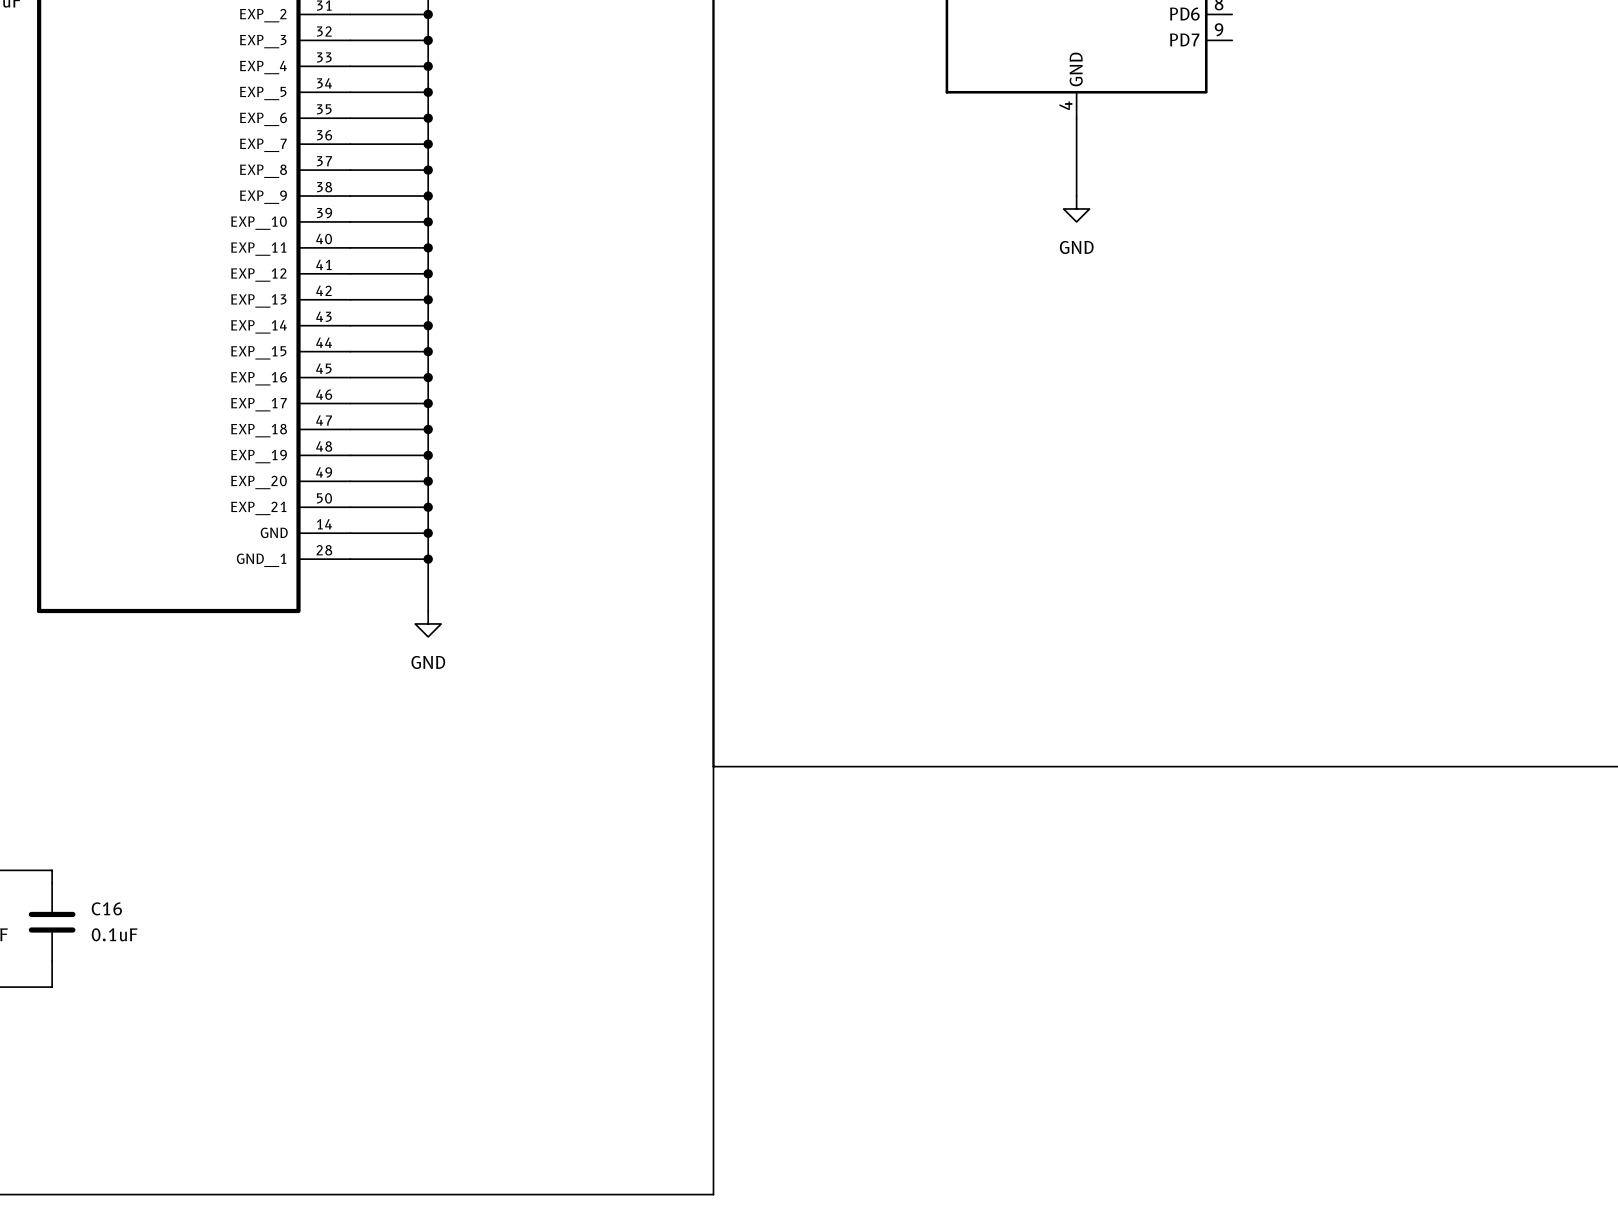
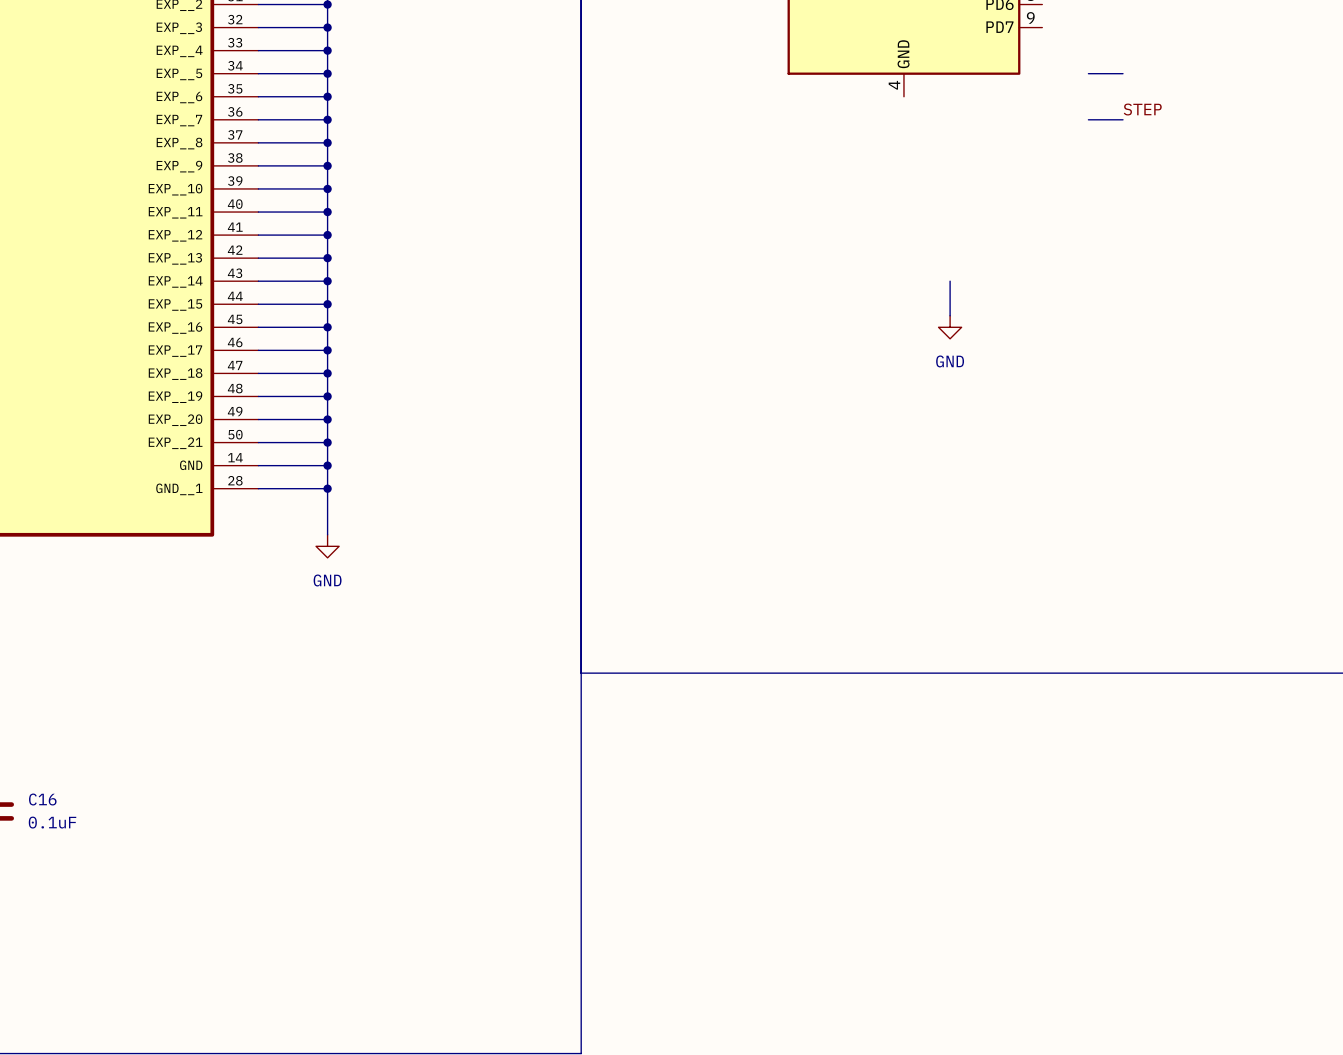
wire: none -> (1088, 73) (1123, 73)
wire: (1076, 118) (1076, 196) -> none
label: none -> STEP (1142, 109)
wire: none -> (1088, 119) (1123, 119)
power symbol position: GND (1076, 208) -> GND (950, 327)
wire: none -> (950, 281) (950, 315)

